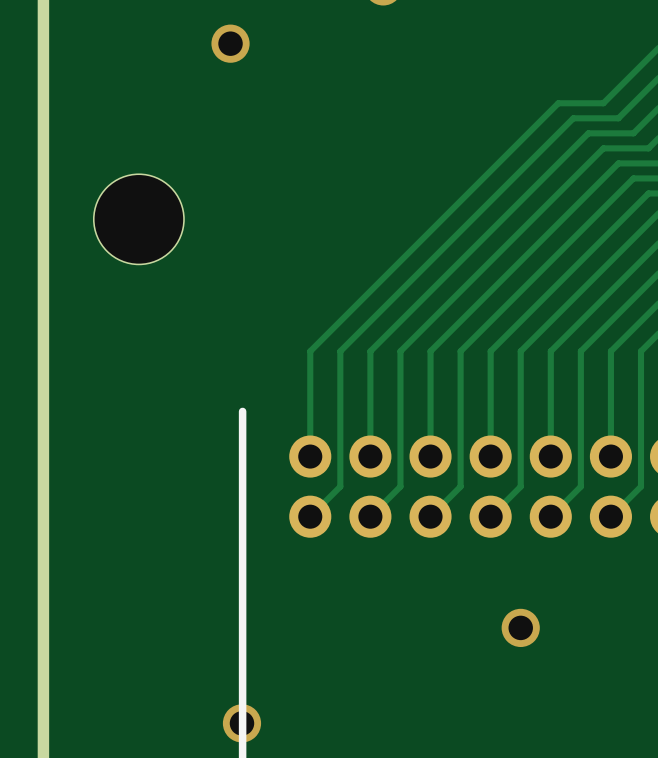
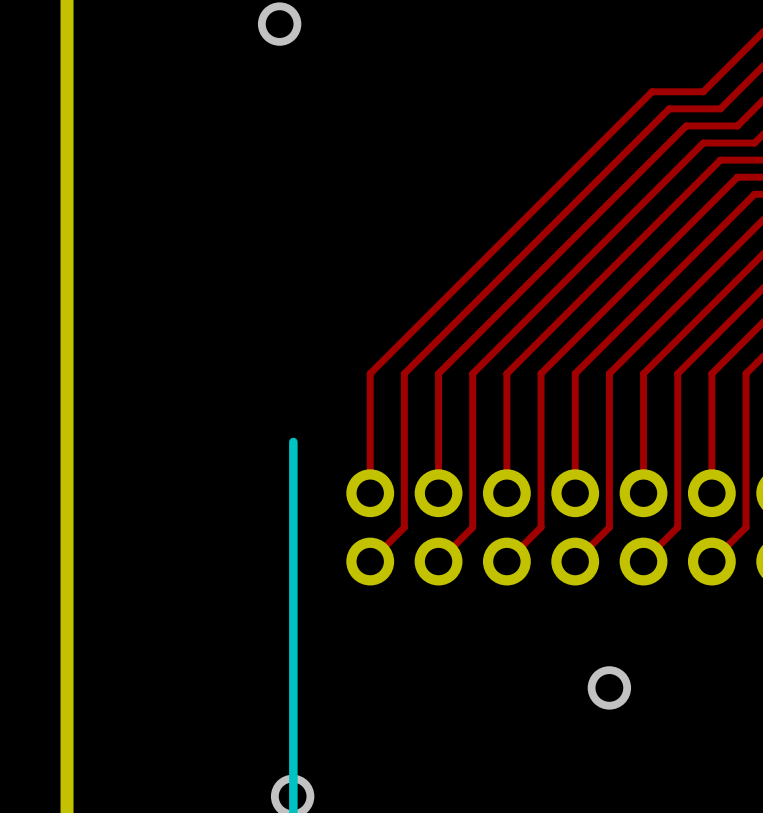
part: (138, 219) -> none

